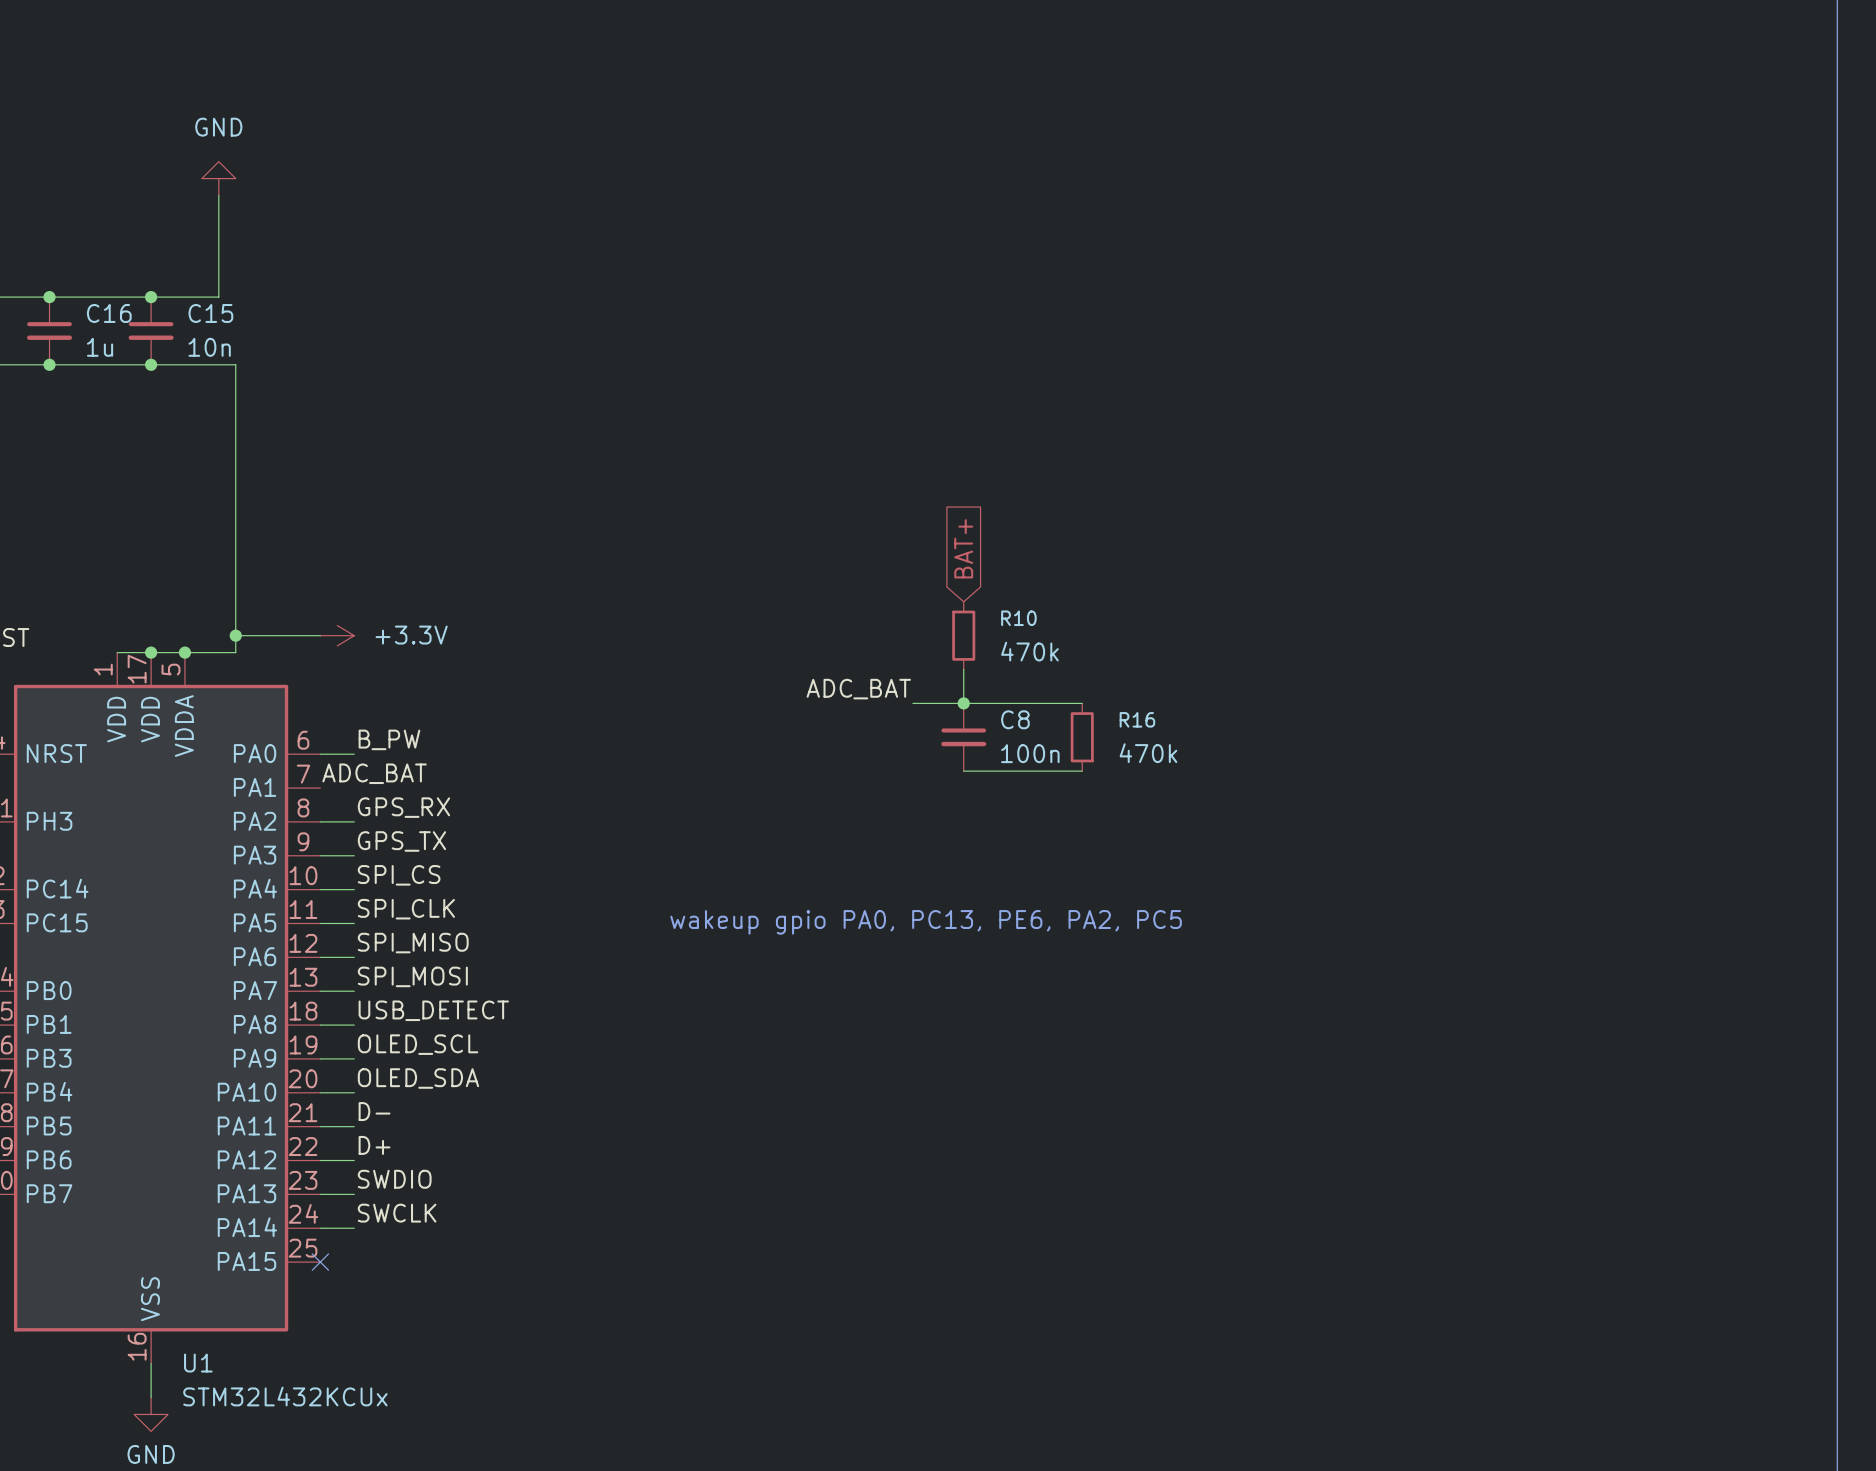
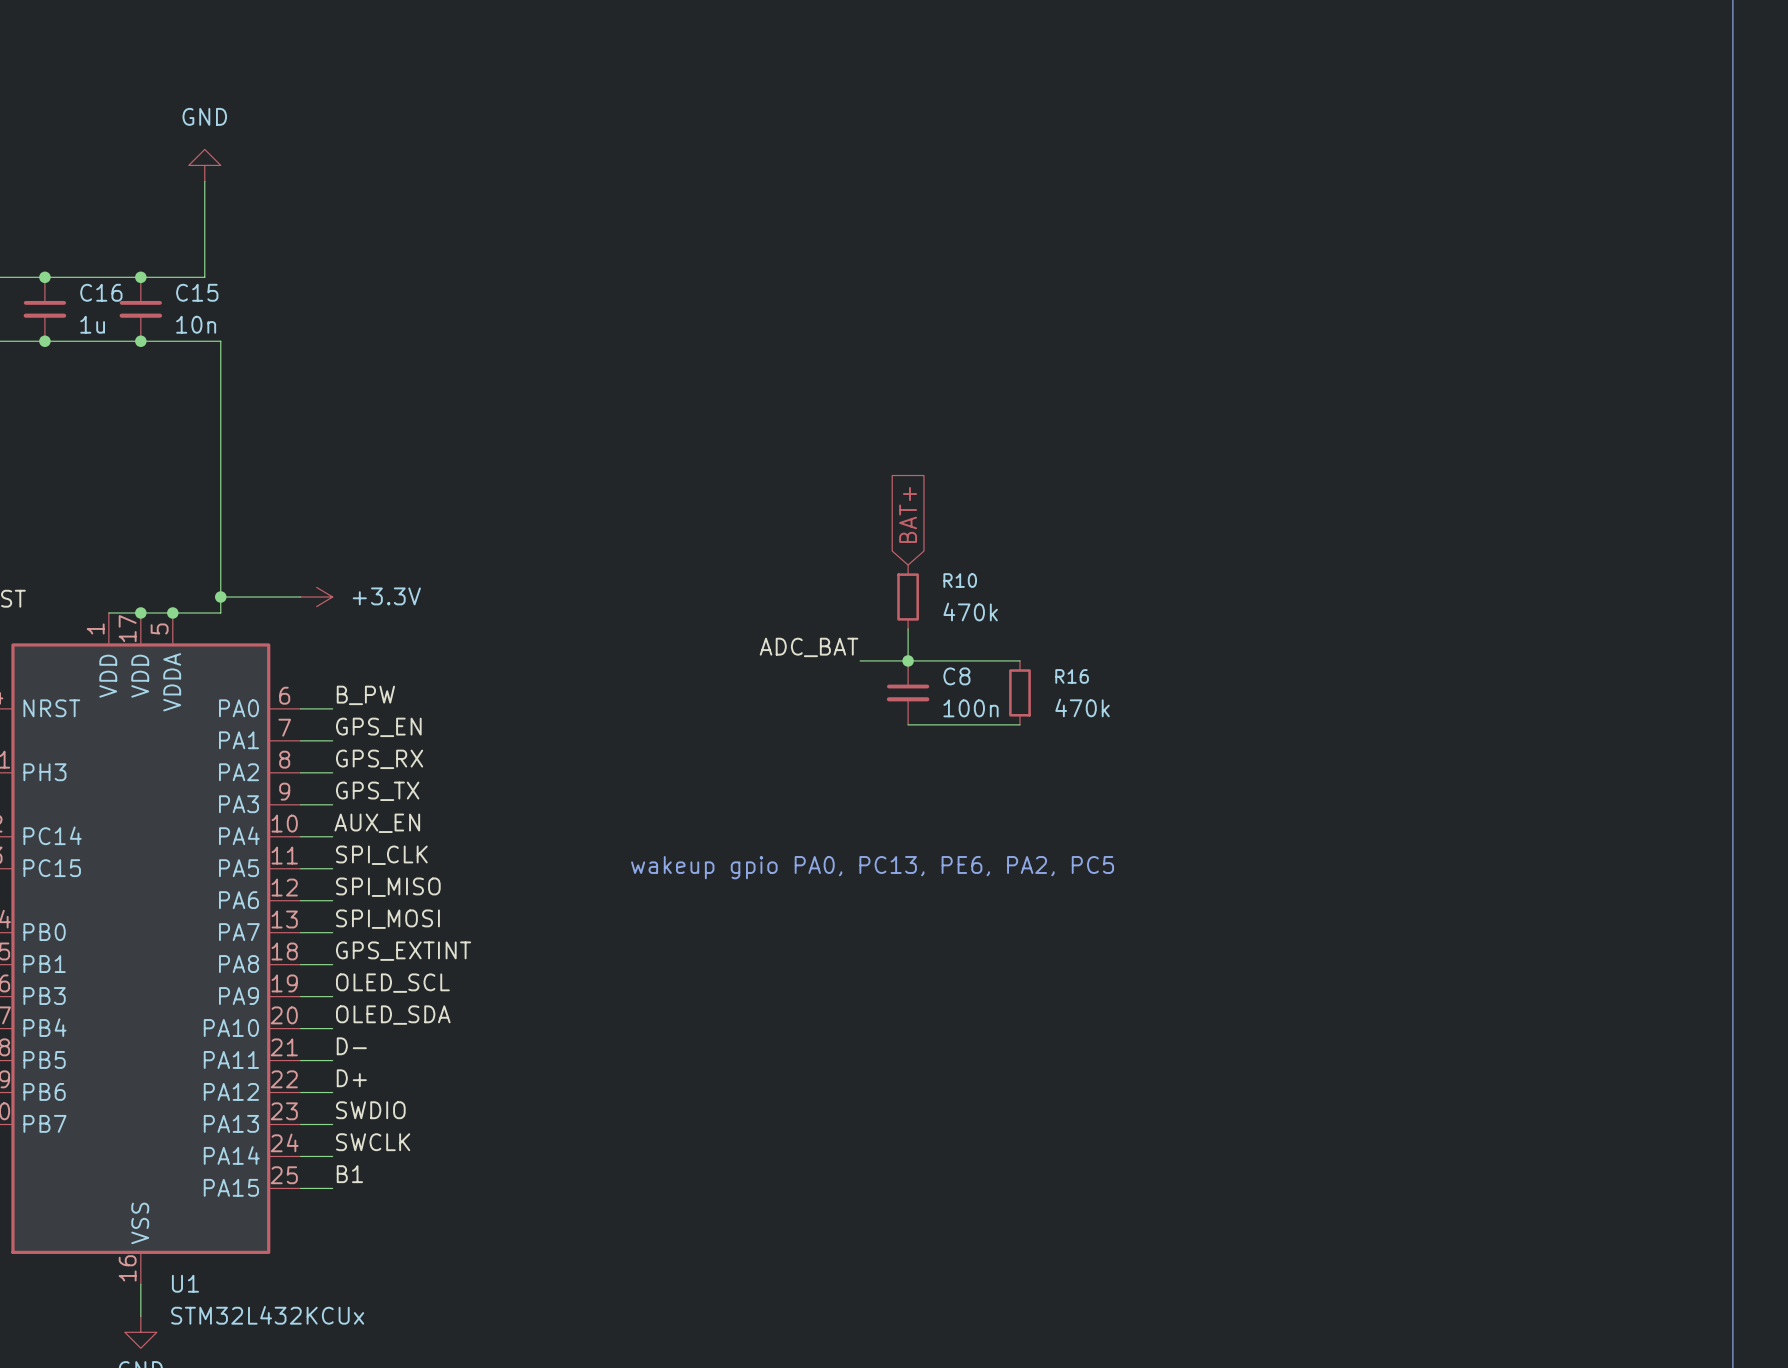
label: ADC_BAT (374, 773) -> none
label: none -> GPS_EN (378, 727)
wire: none -> (300, 740) (332, 740)
label: SPI_CS (399, 875) -> AUX_EN (377, 823)
label: USB_DETECT (433, 1010) -> GPS_EXTINT (403, 951)
label: none -> B1 (349, 1174)
wire: none -> (300, 1188) (332, 1188)
no-connect mark: (320, 1262) -> none

